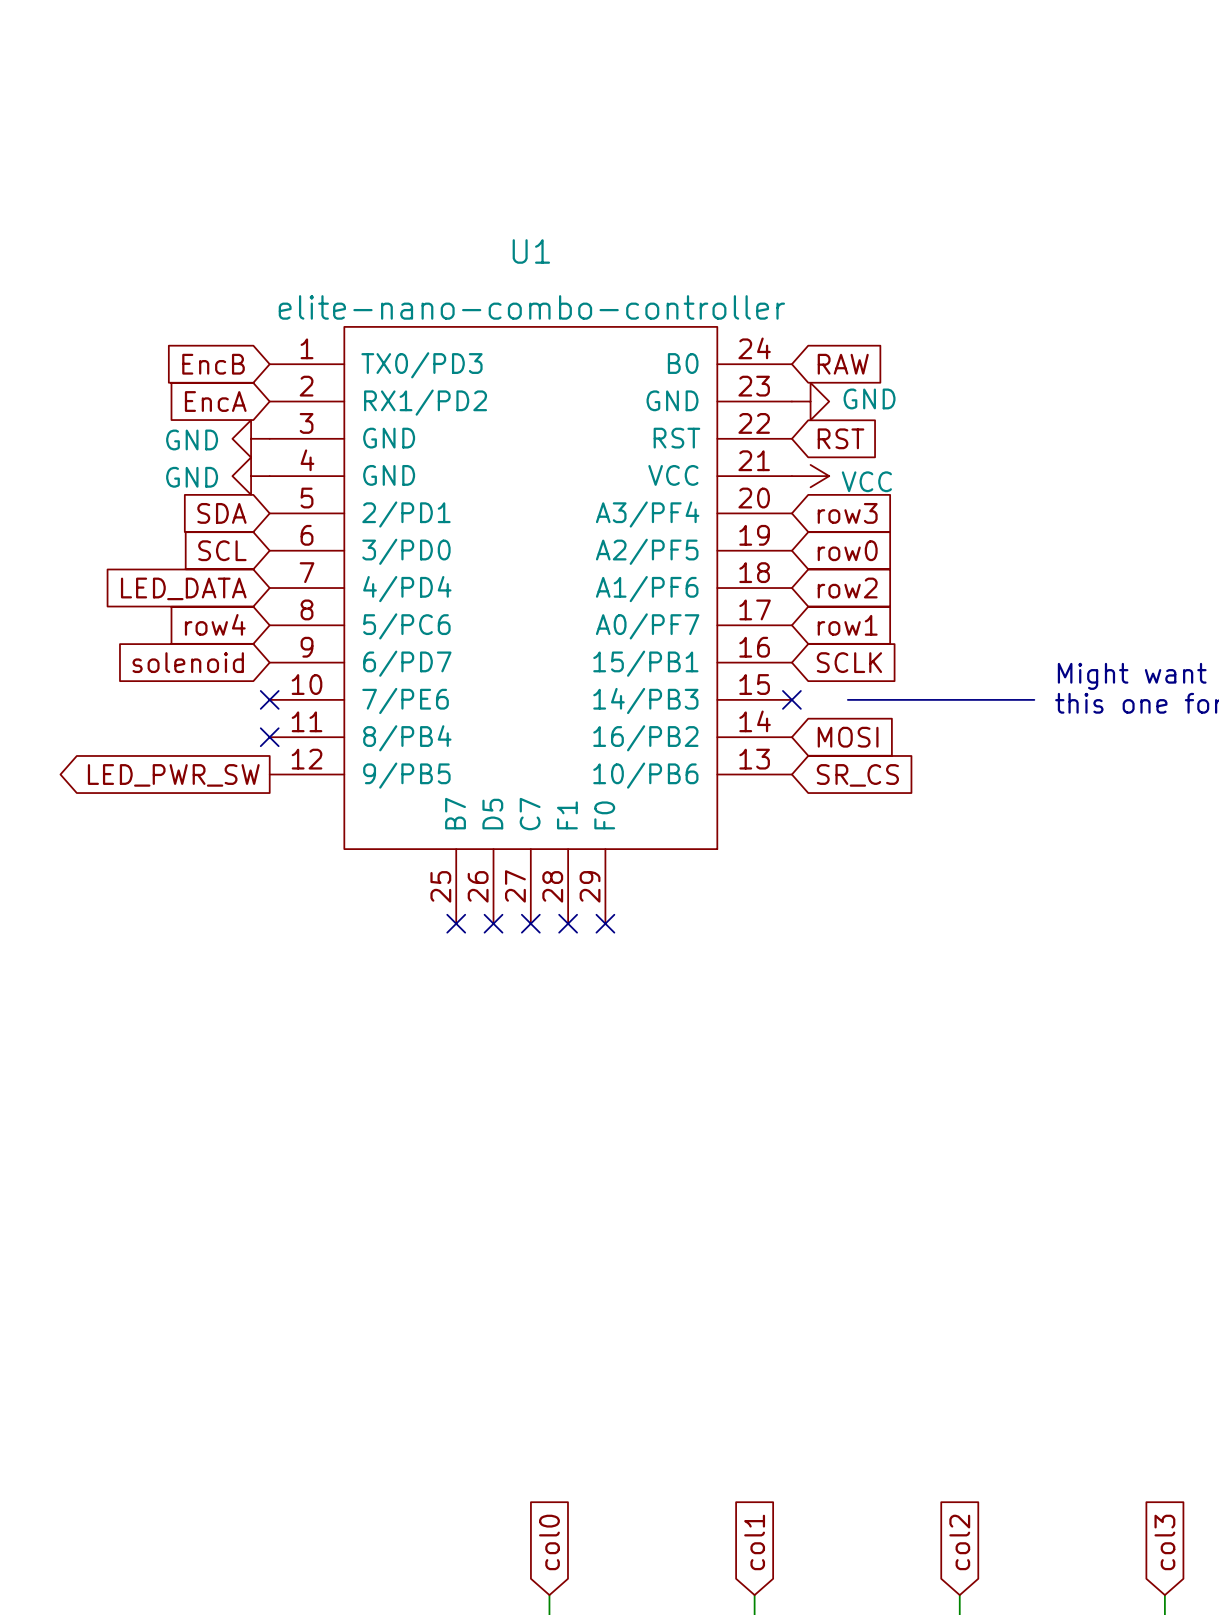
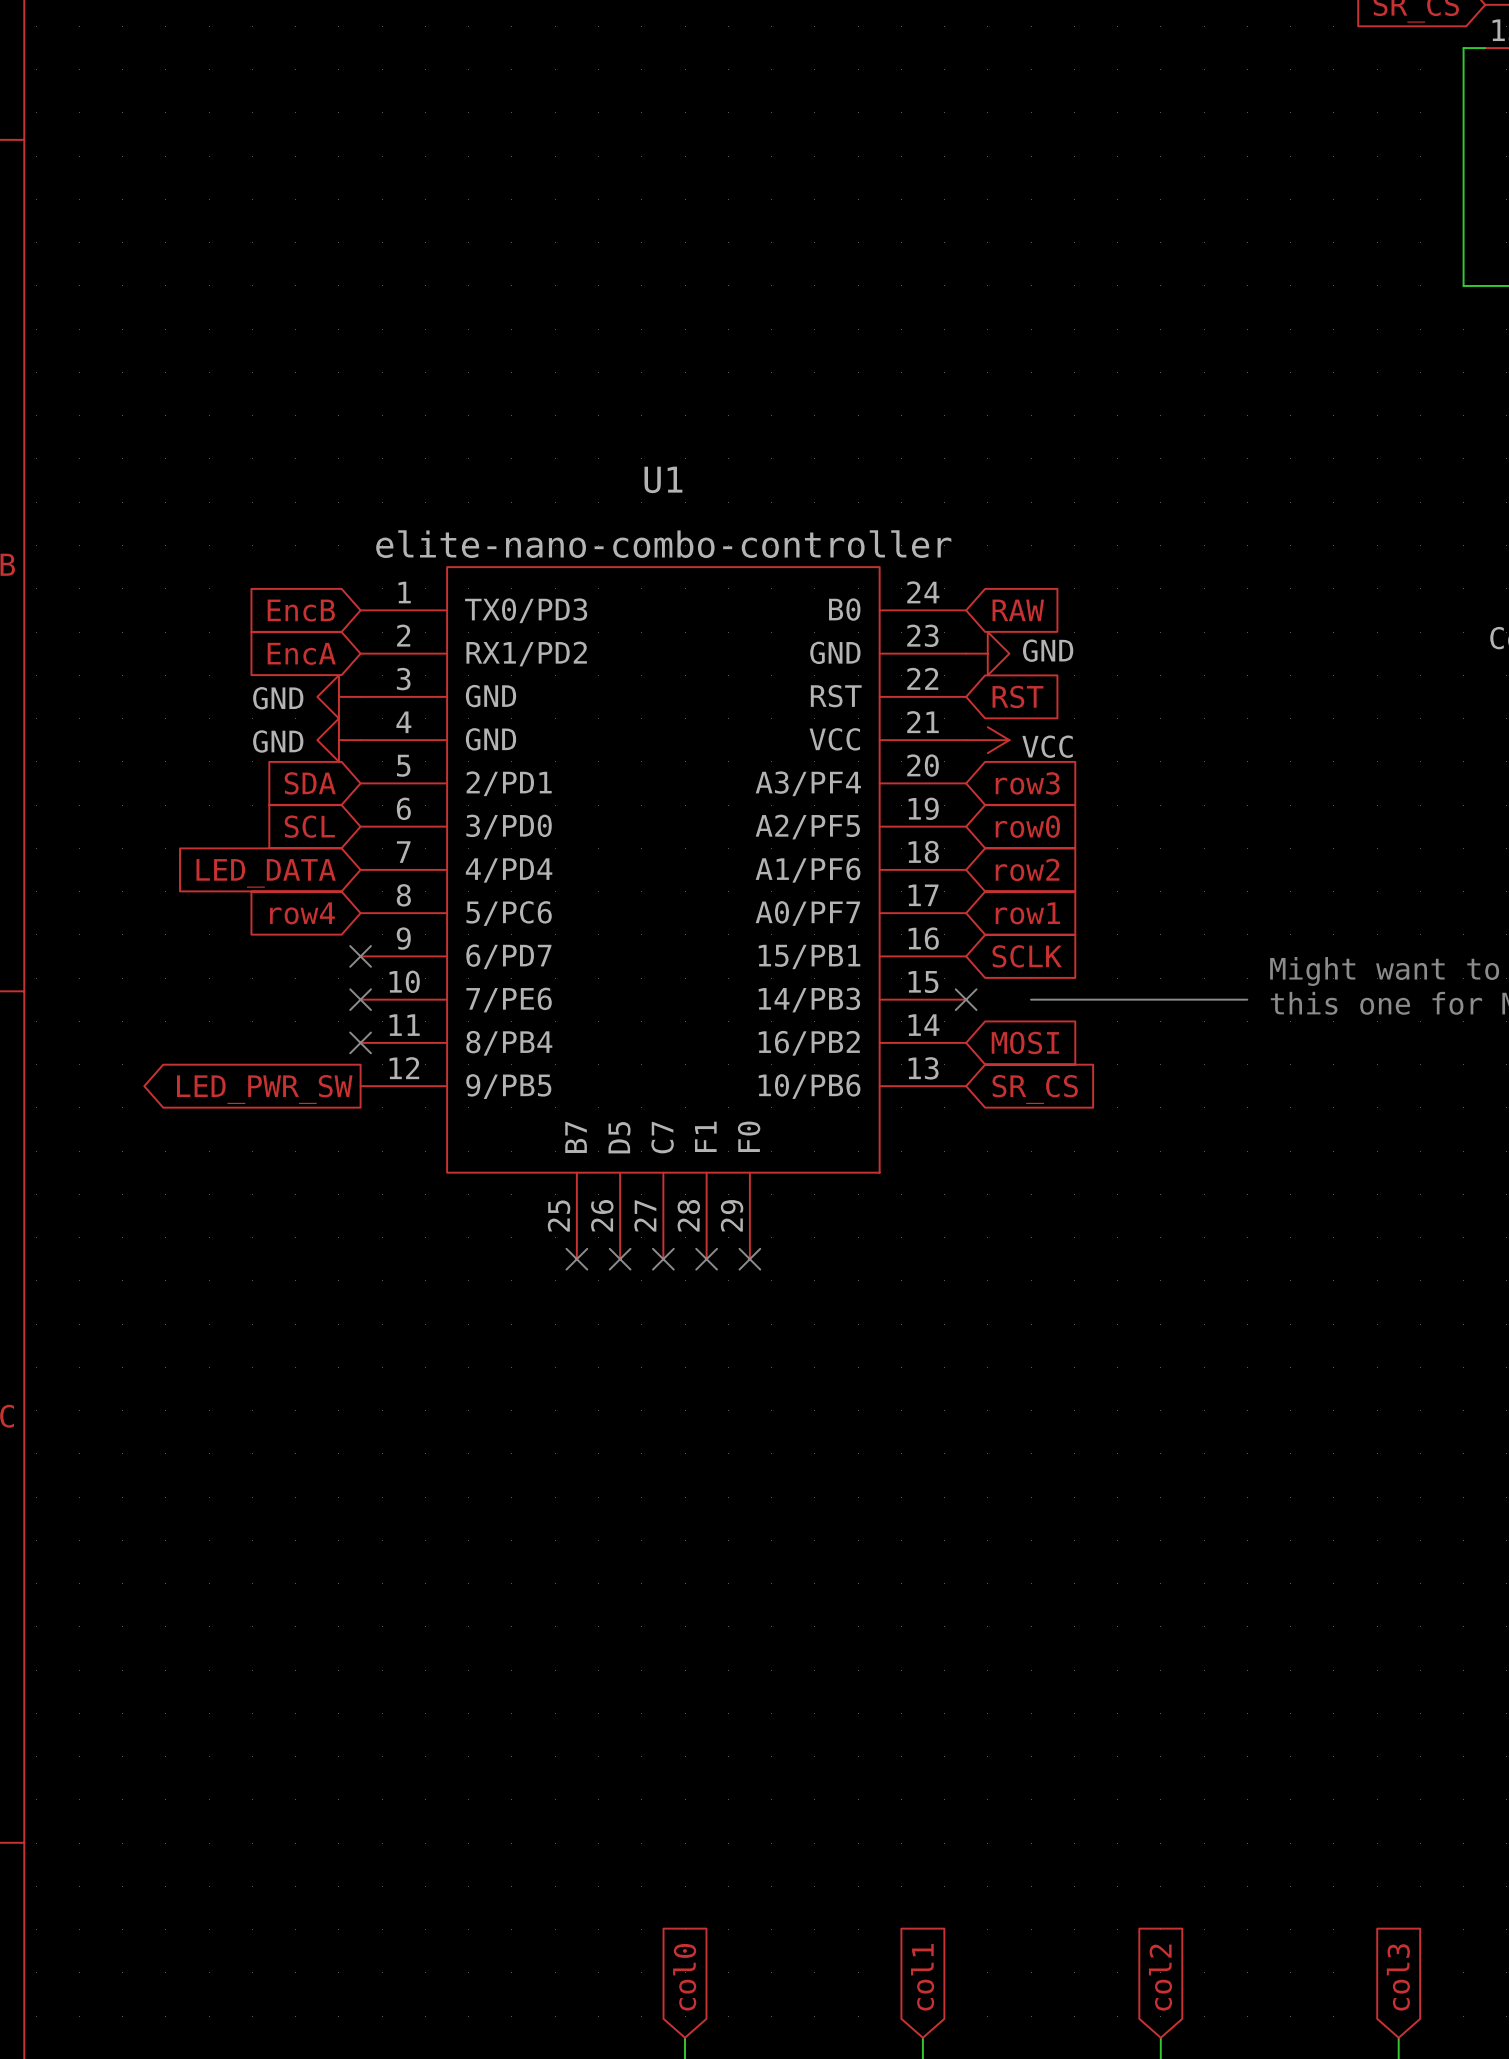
global label: solenoid (188, 662) -> none
no-connect mark: none -> (360, 956)

